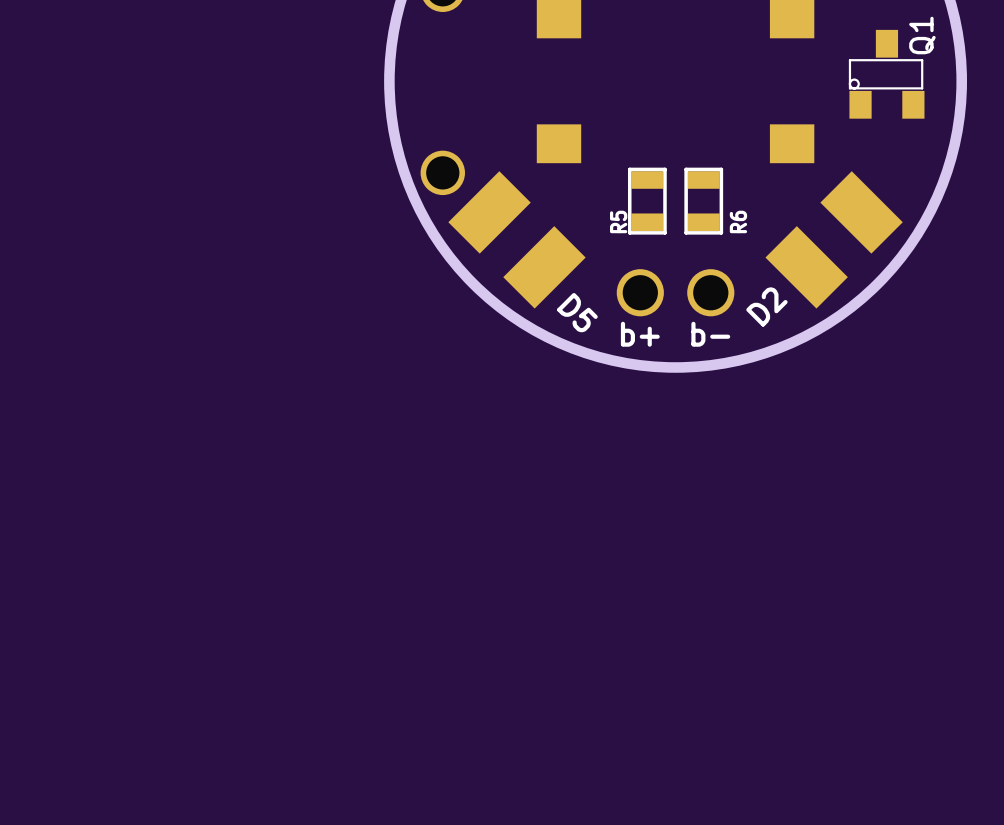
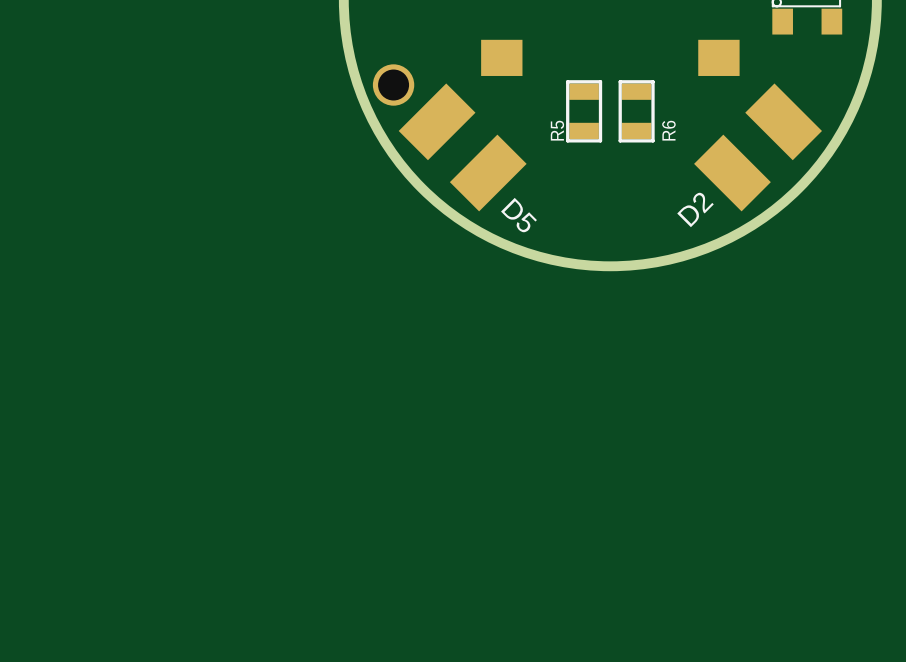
part: b+ (640, 292) -> none
part: b- (710, 292) -> none

